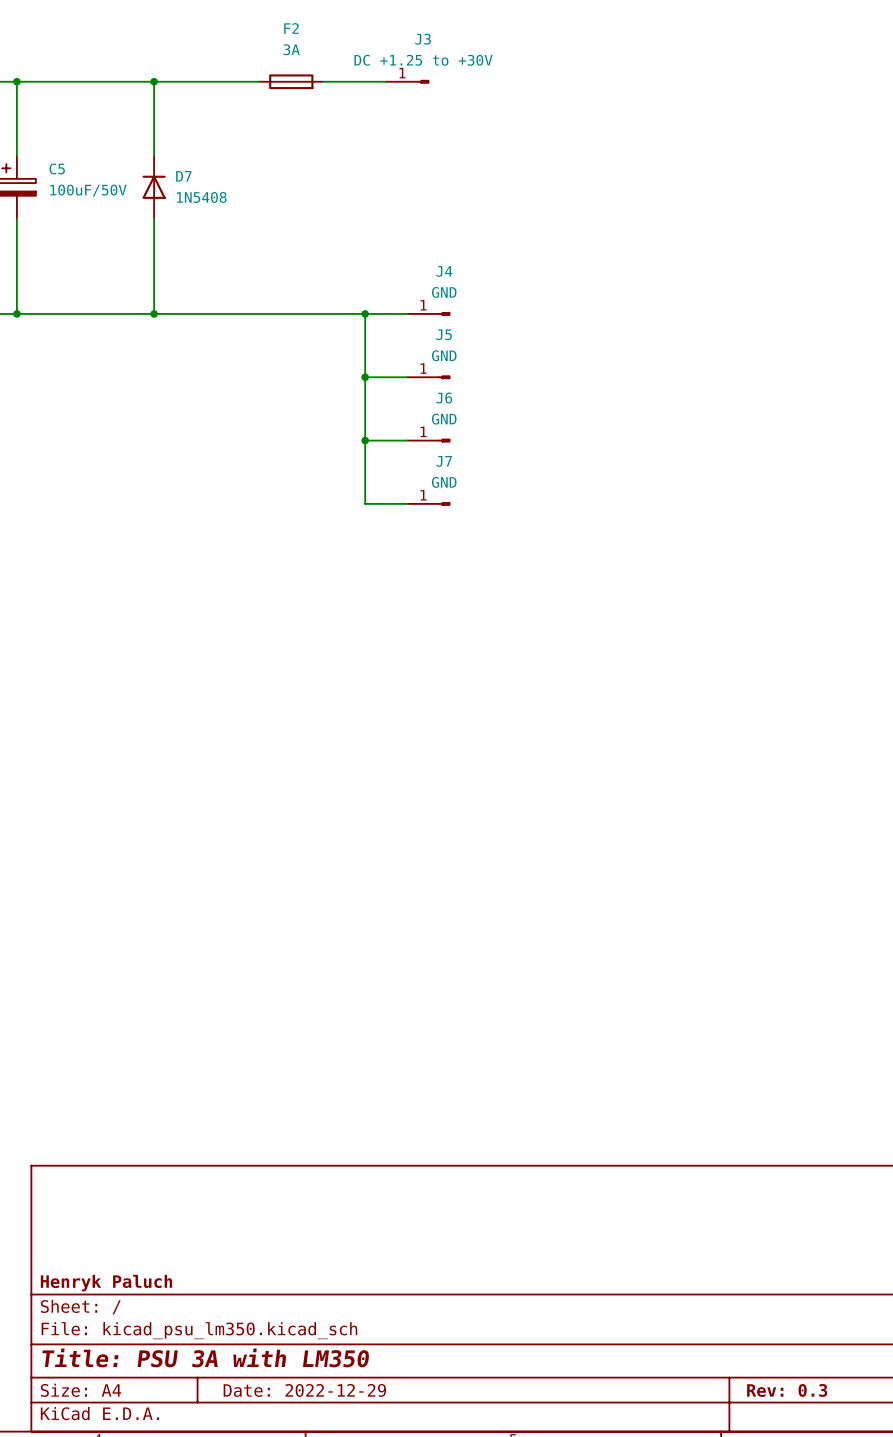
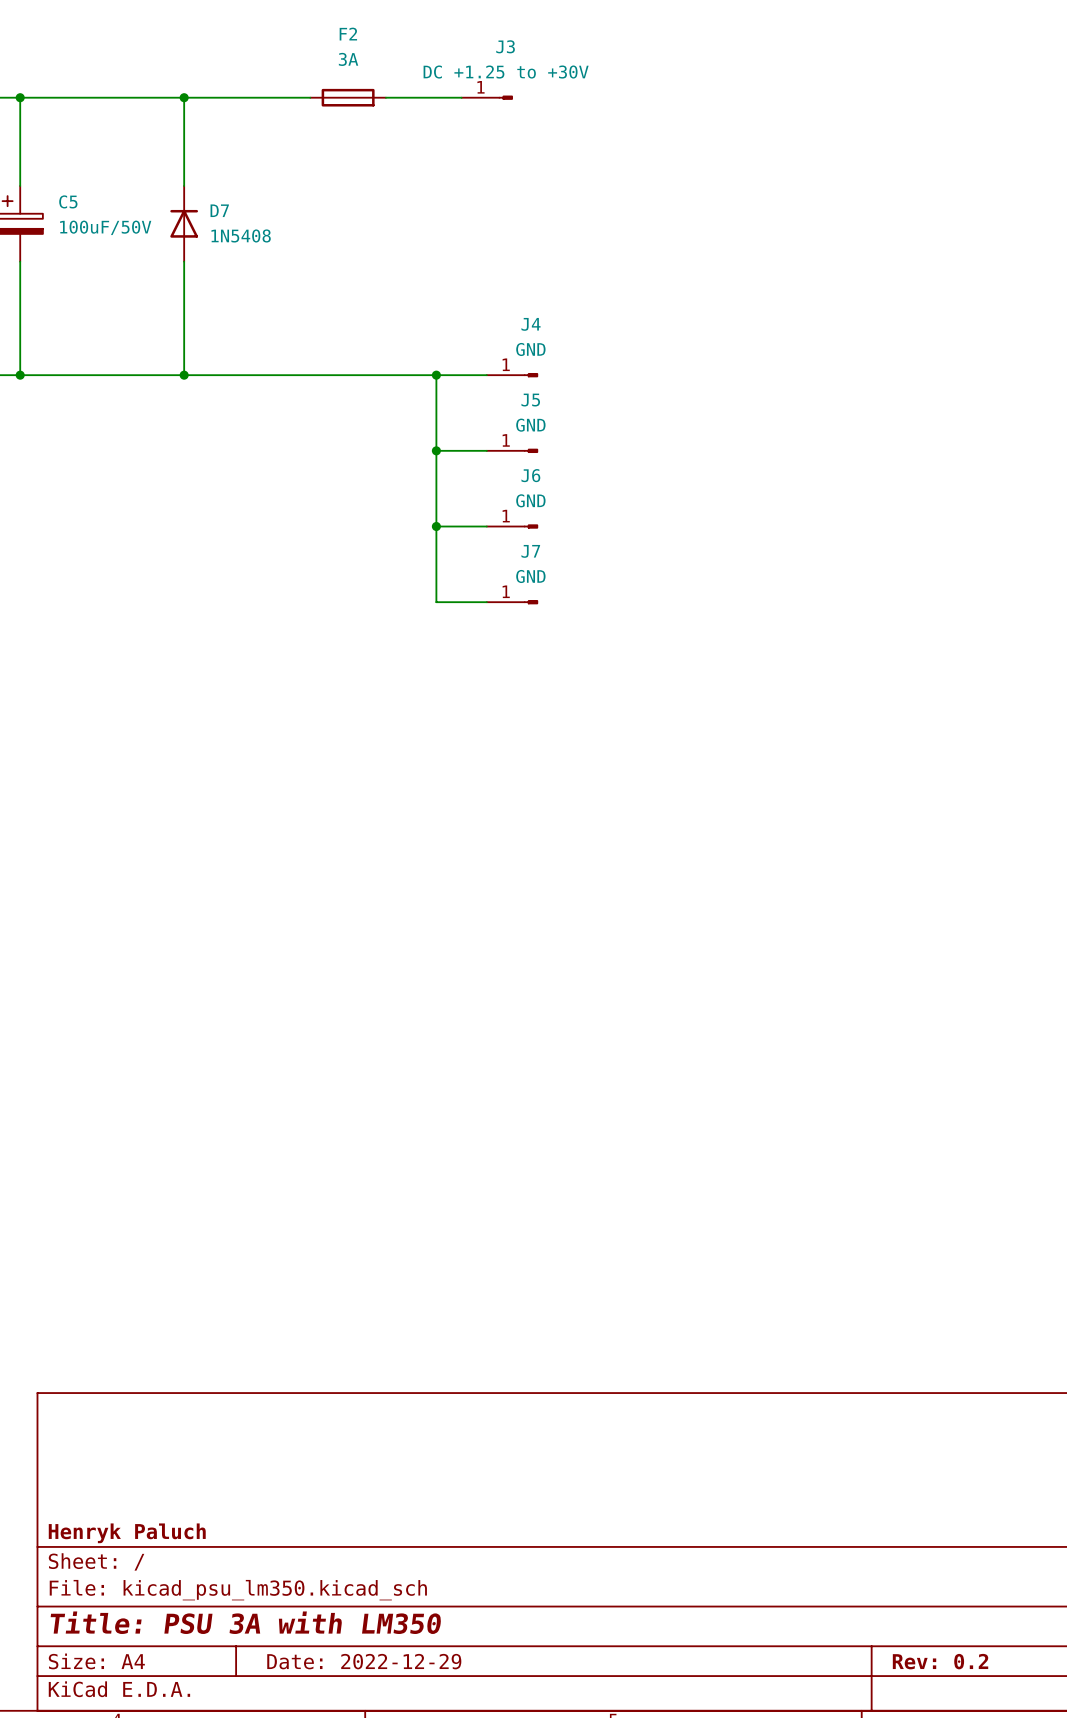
title block: Rev: 0.3 (787, 1390) -> Rev: 0.2 (940, 1661)

